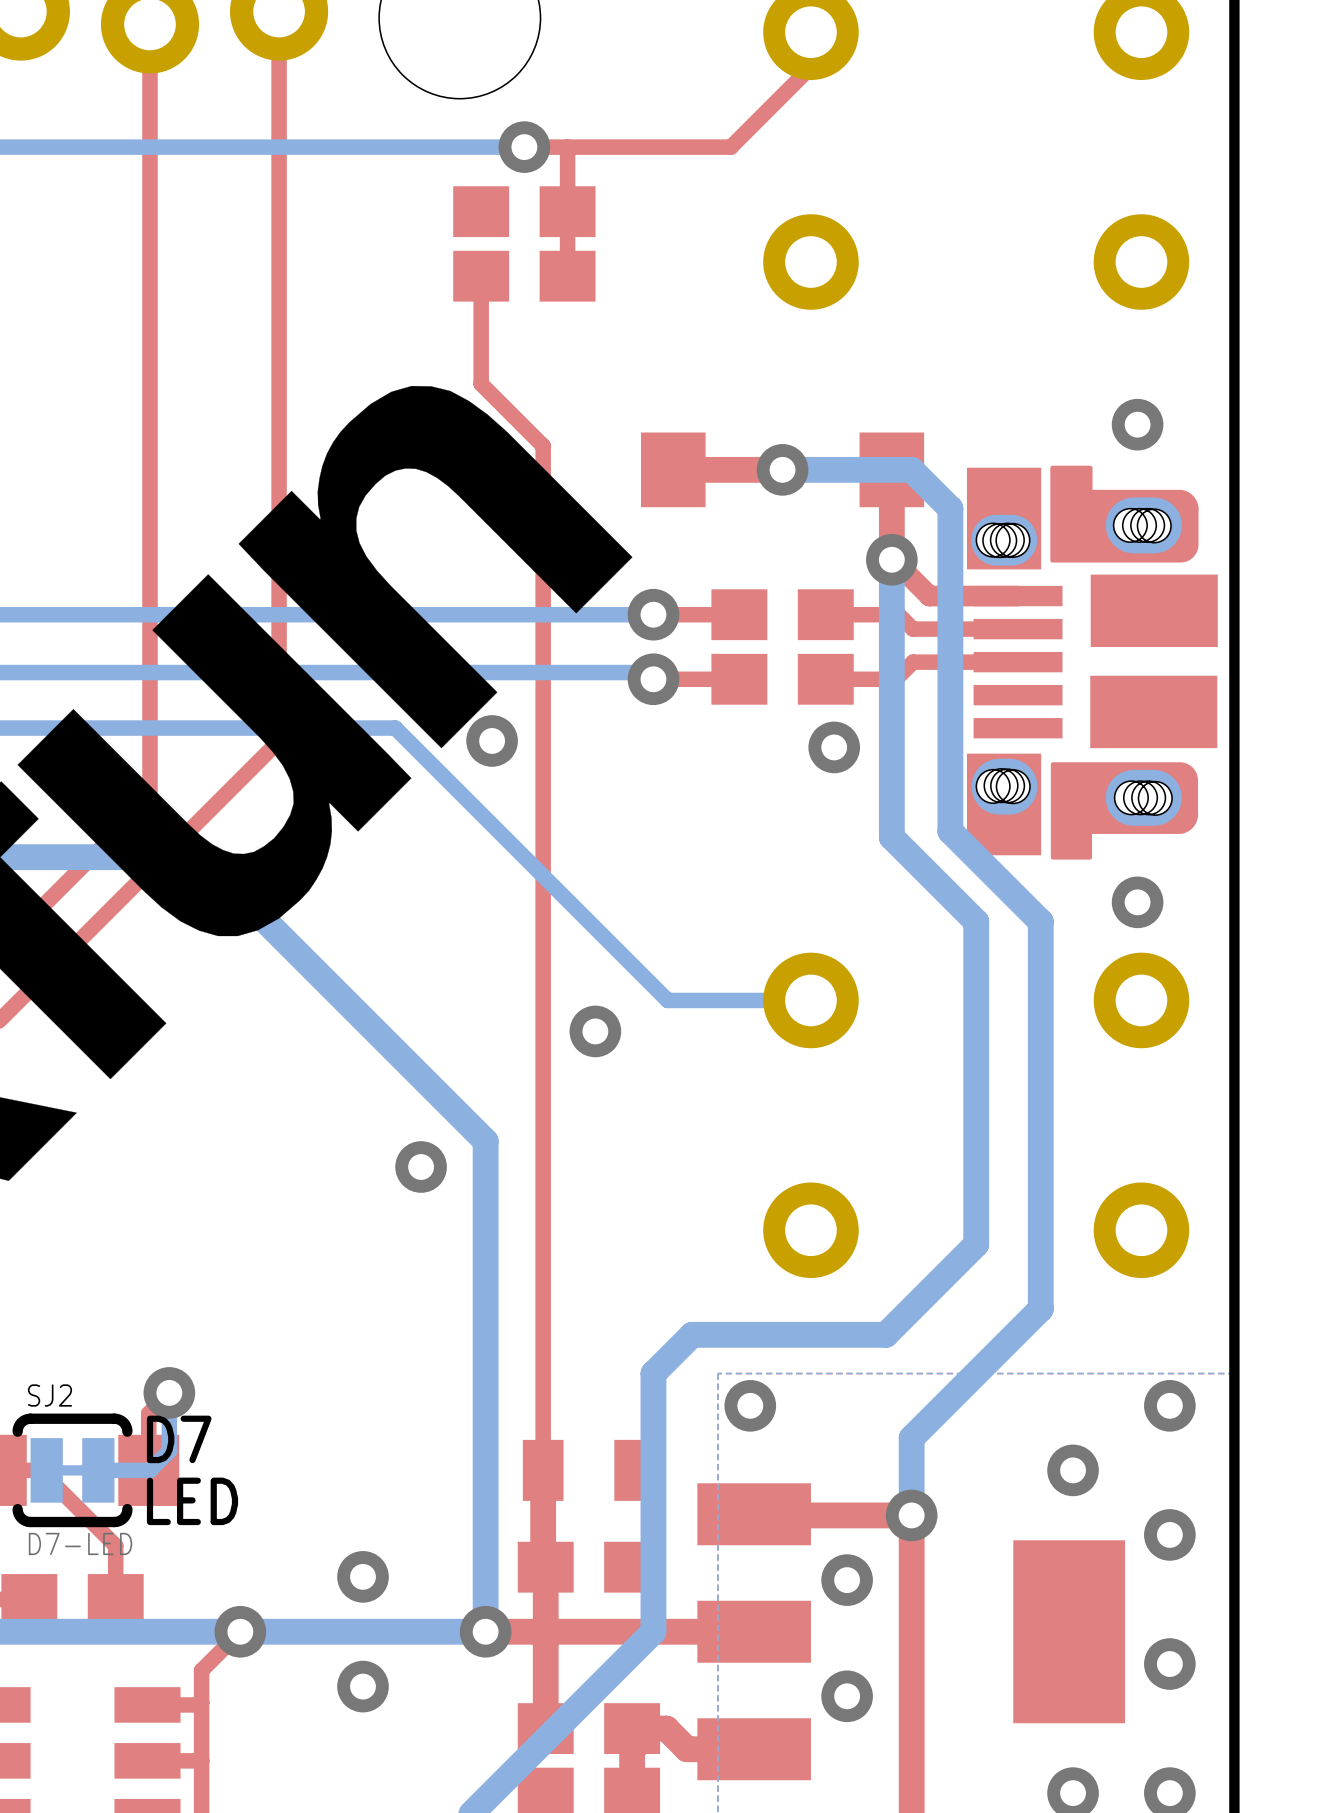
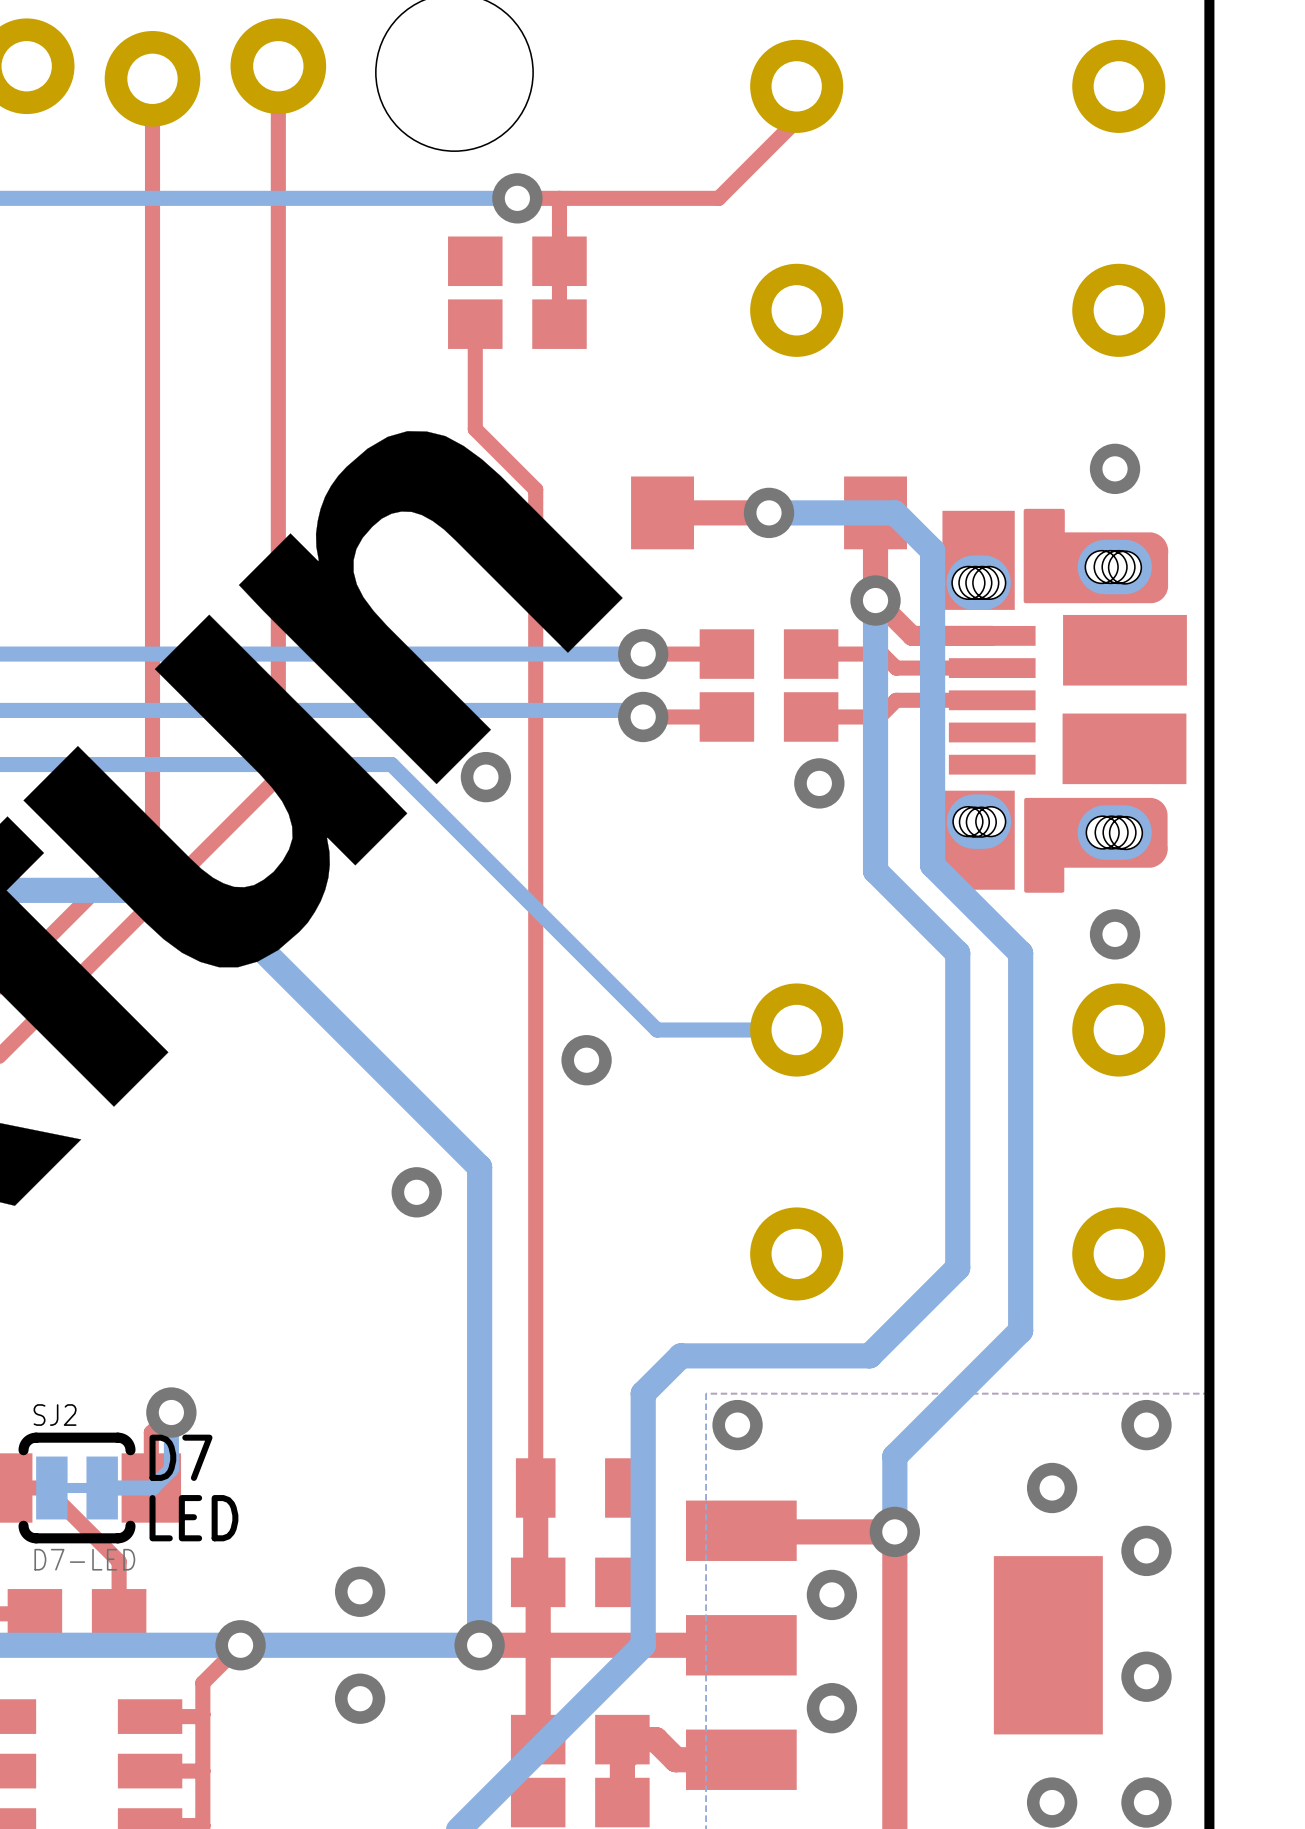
part footprint: [966, 465, 1218, 860] -> [942, 508, 1187, 893]

